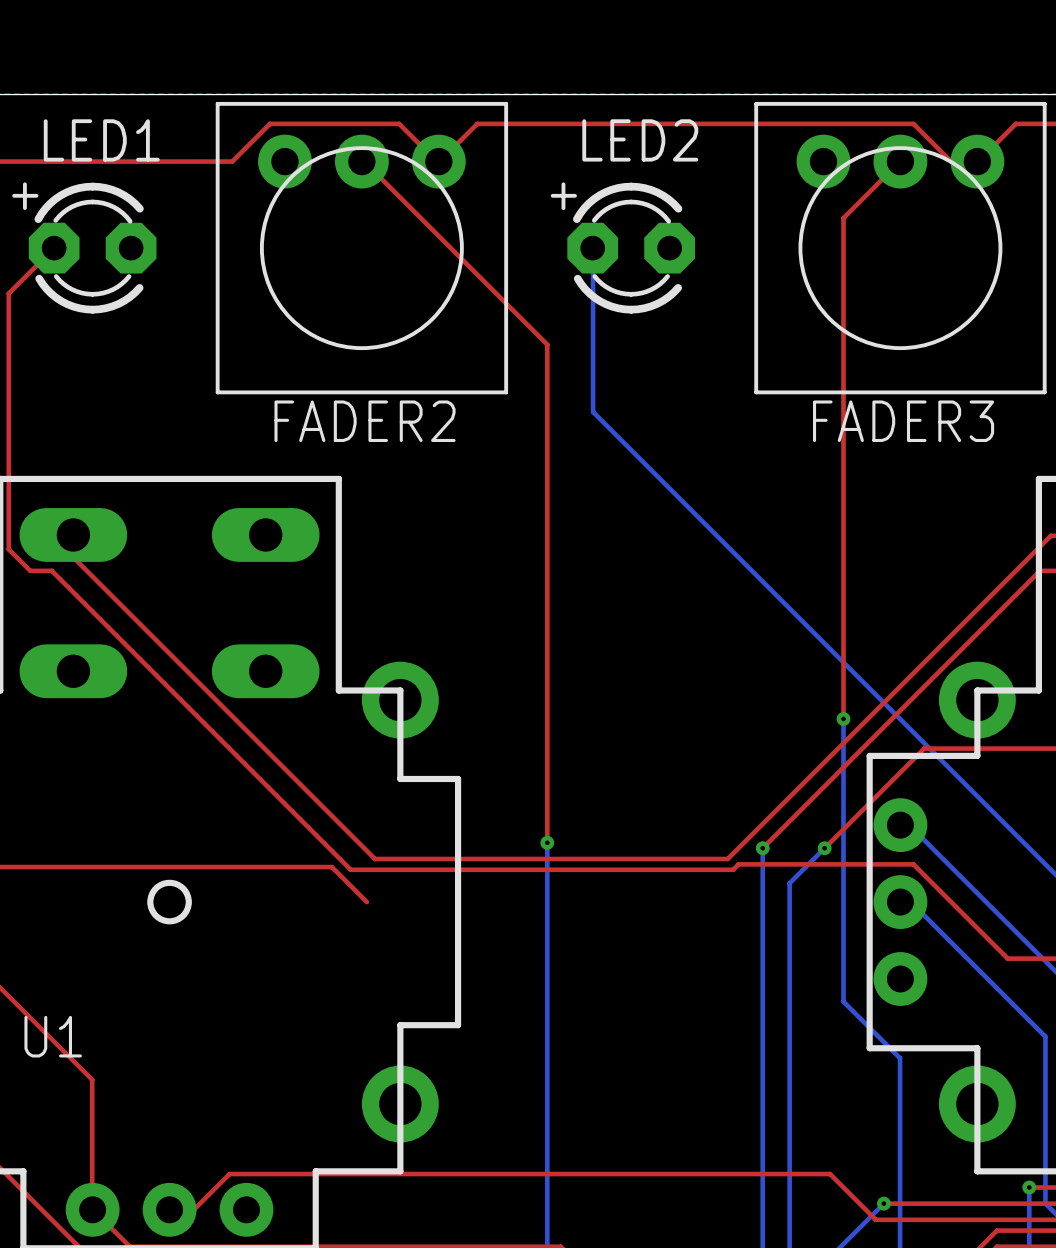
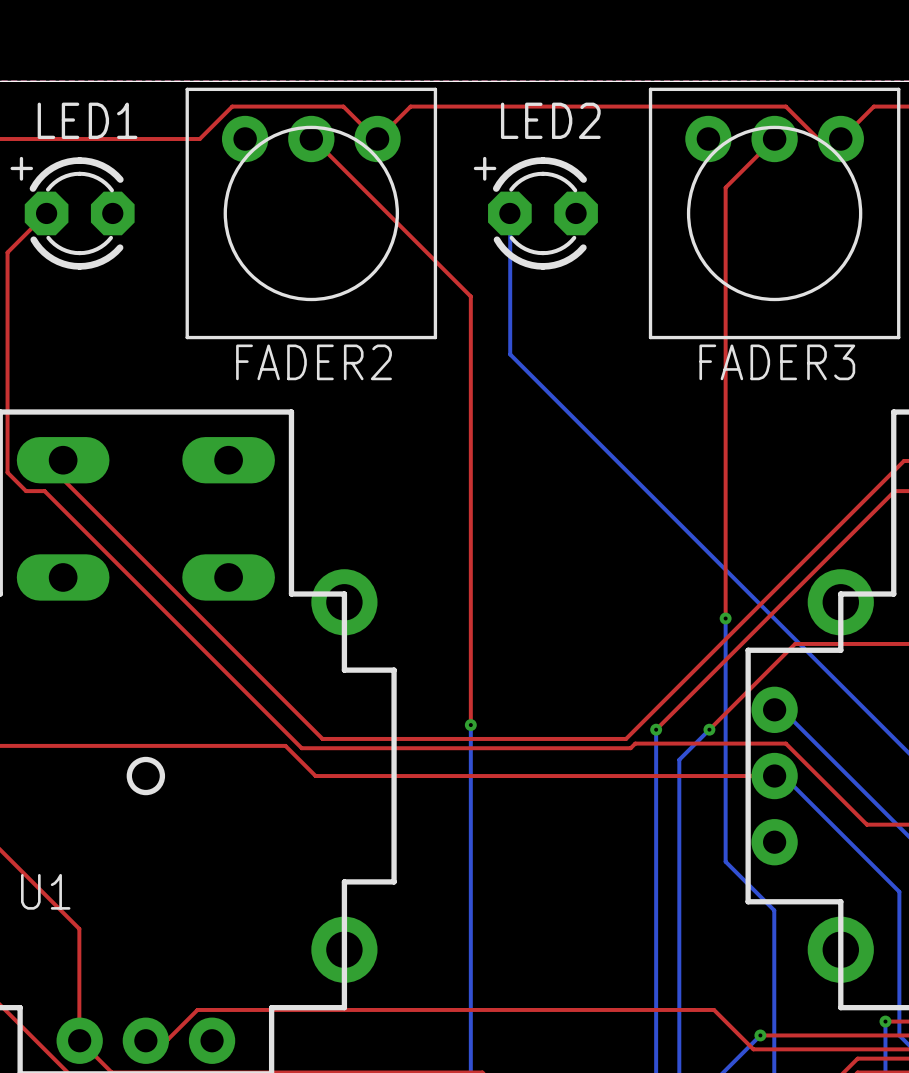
top track: none -> (315, 776) (774, 776)

